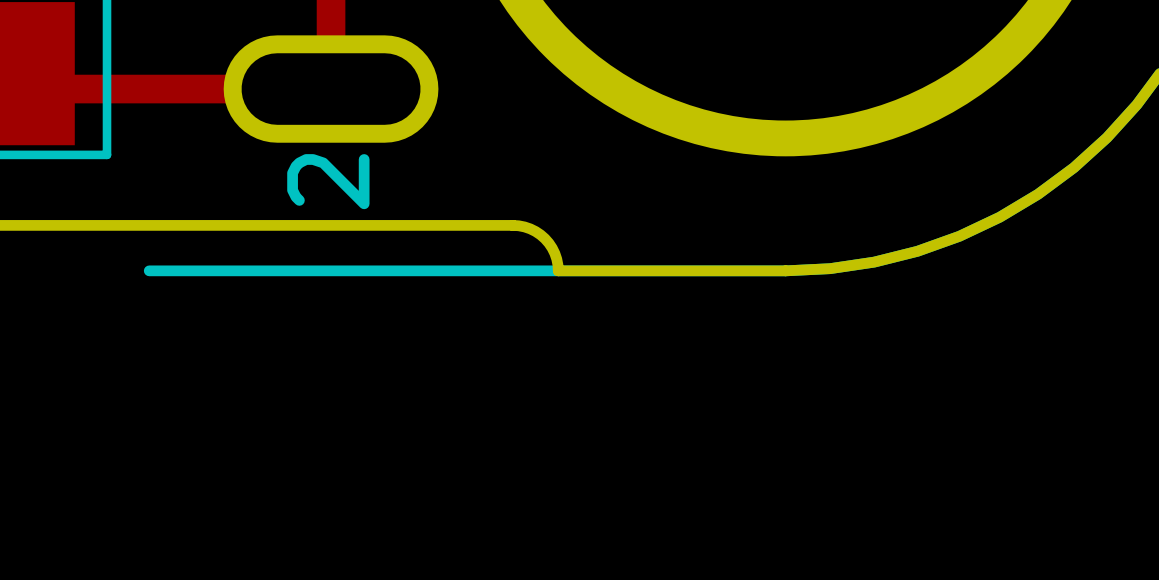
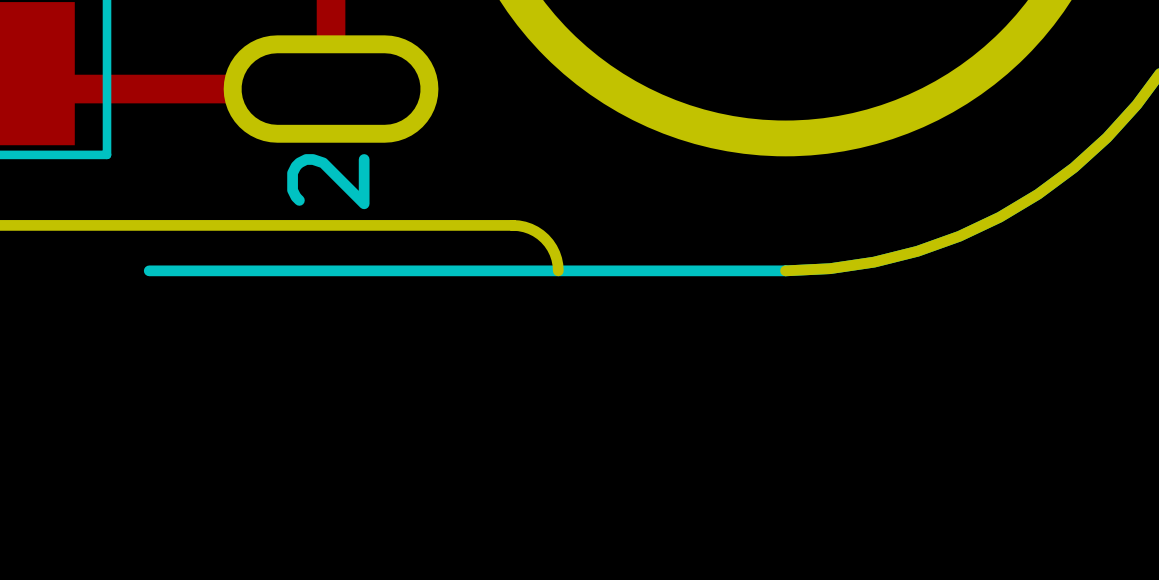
board edge: (558, 270) (785, 270) -> none

